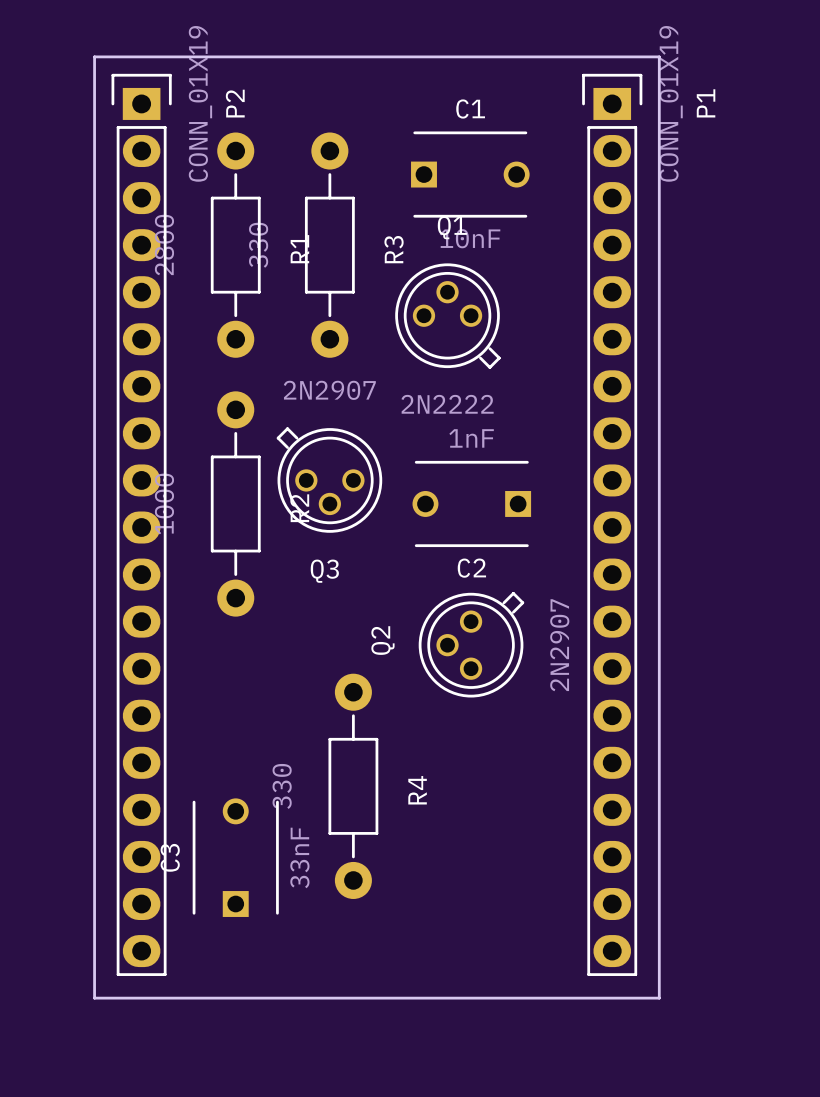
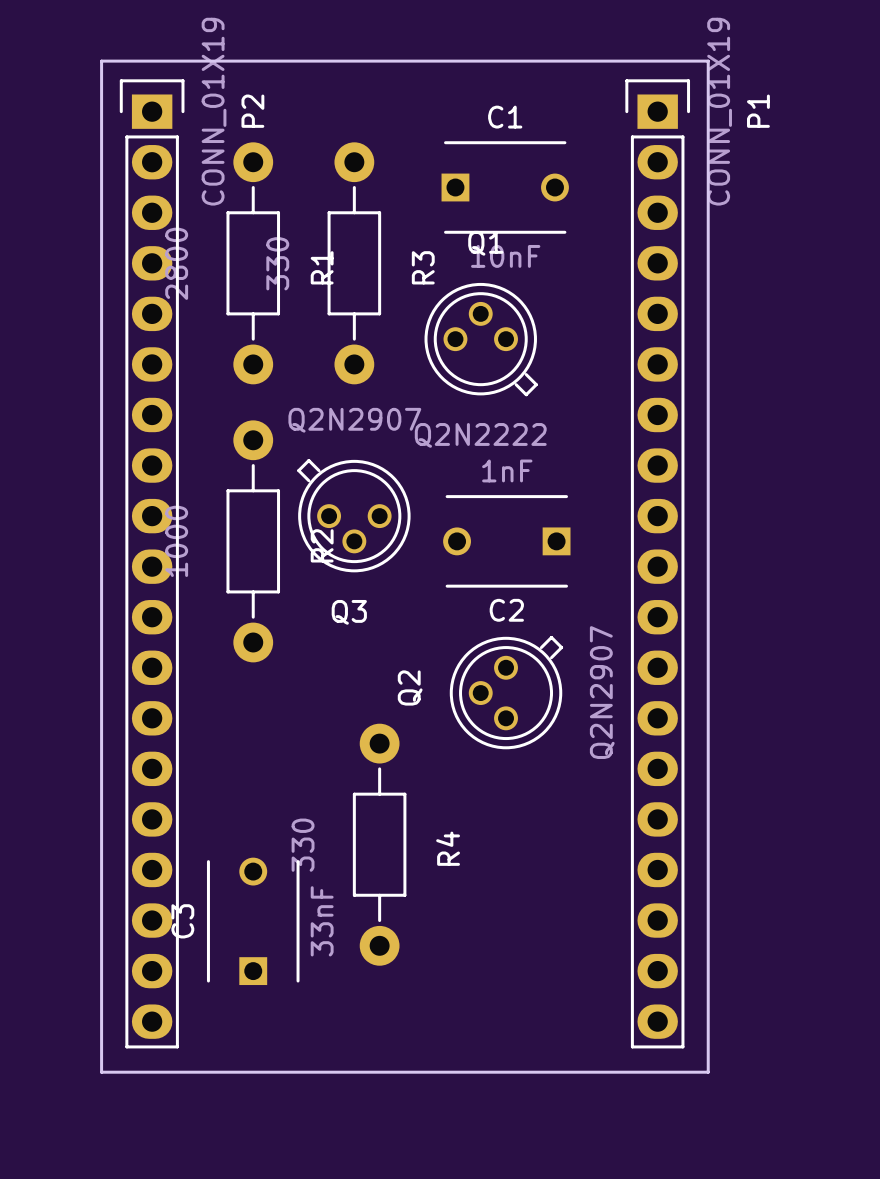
Q3 value: 2N2907 (329, 390) -> Q2N2907 (354, 420)
Q1 value: 2N2222 (447, 404) -> Q2N2222 (480, 435)
Q2 value: 2N2907 (559, 645) -> Q2N2907 (602, 692)

